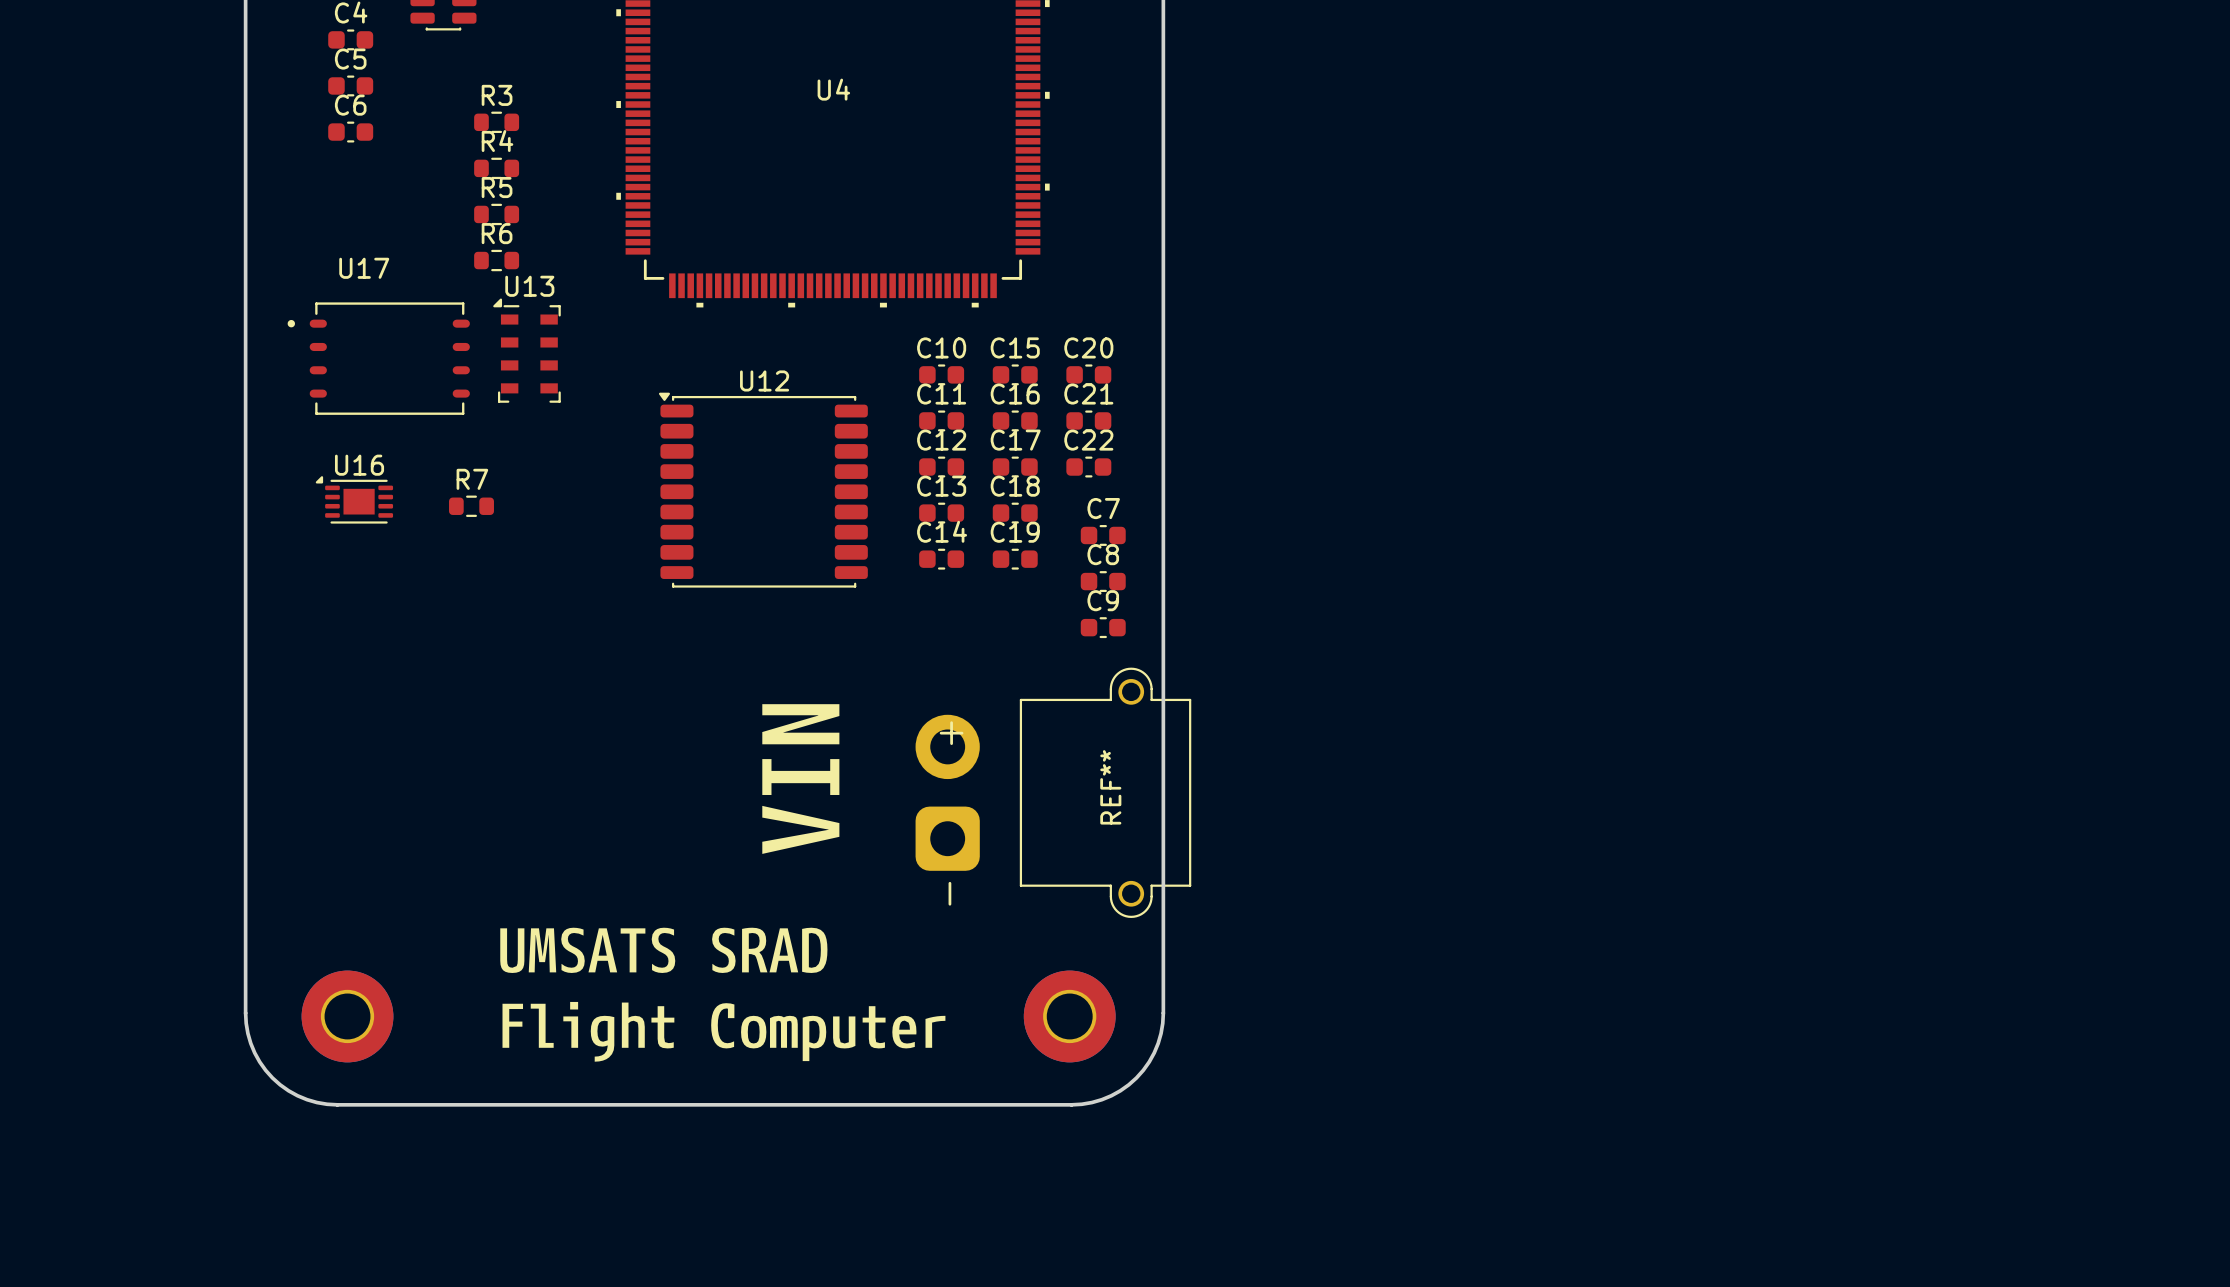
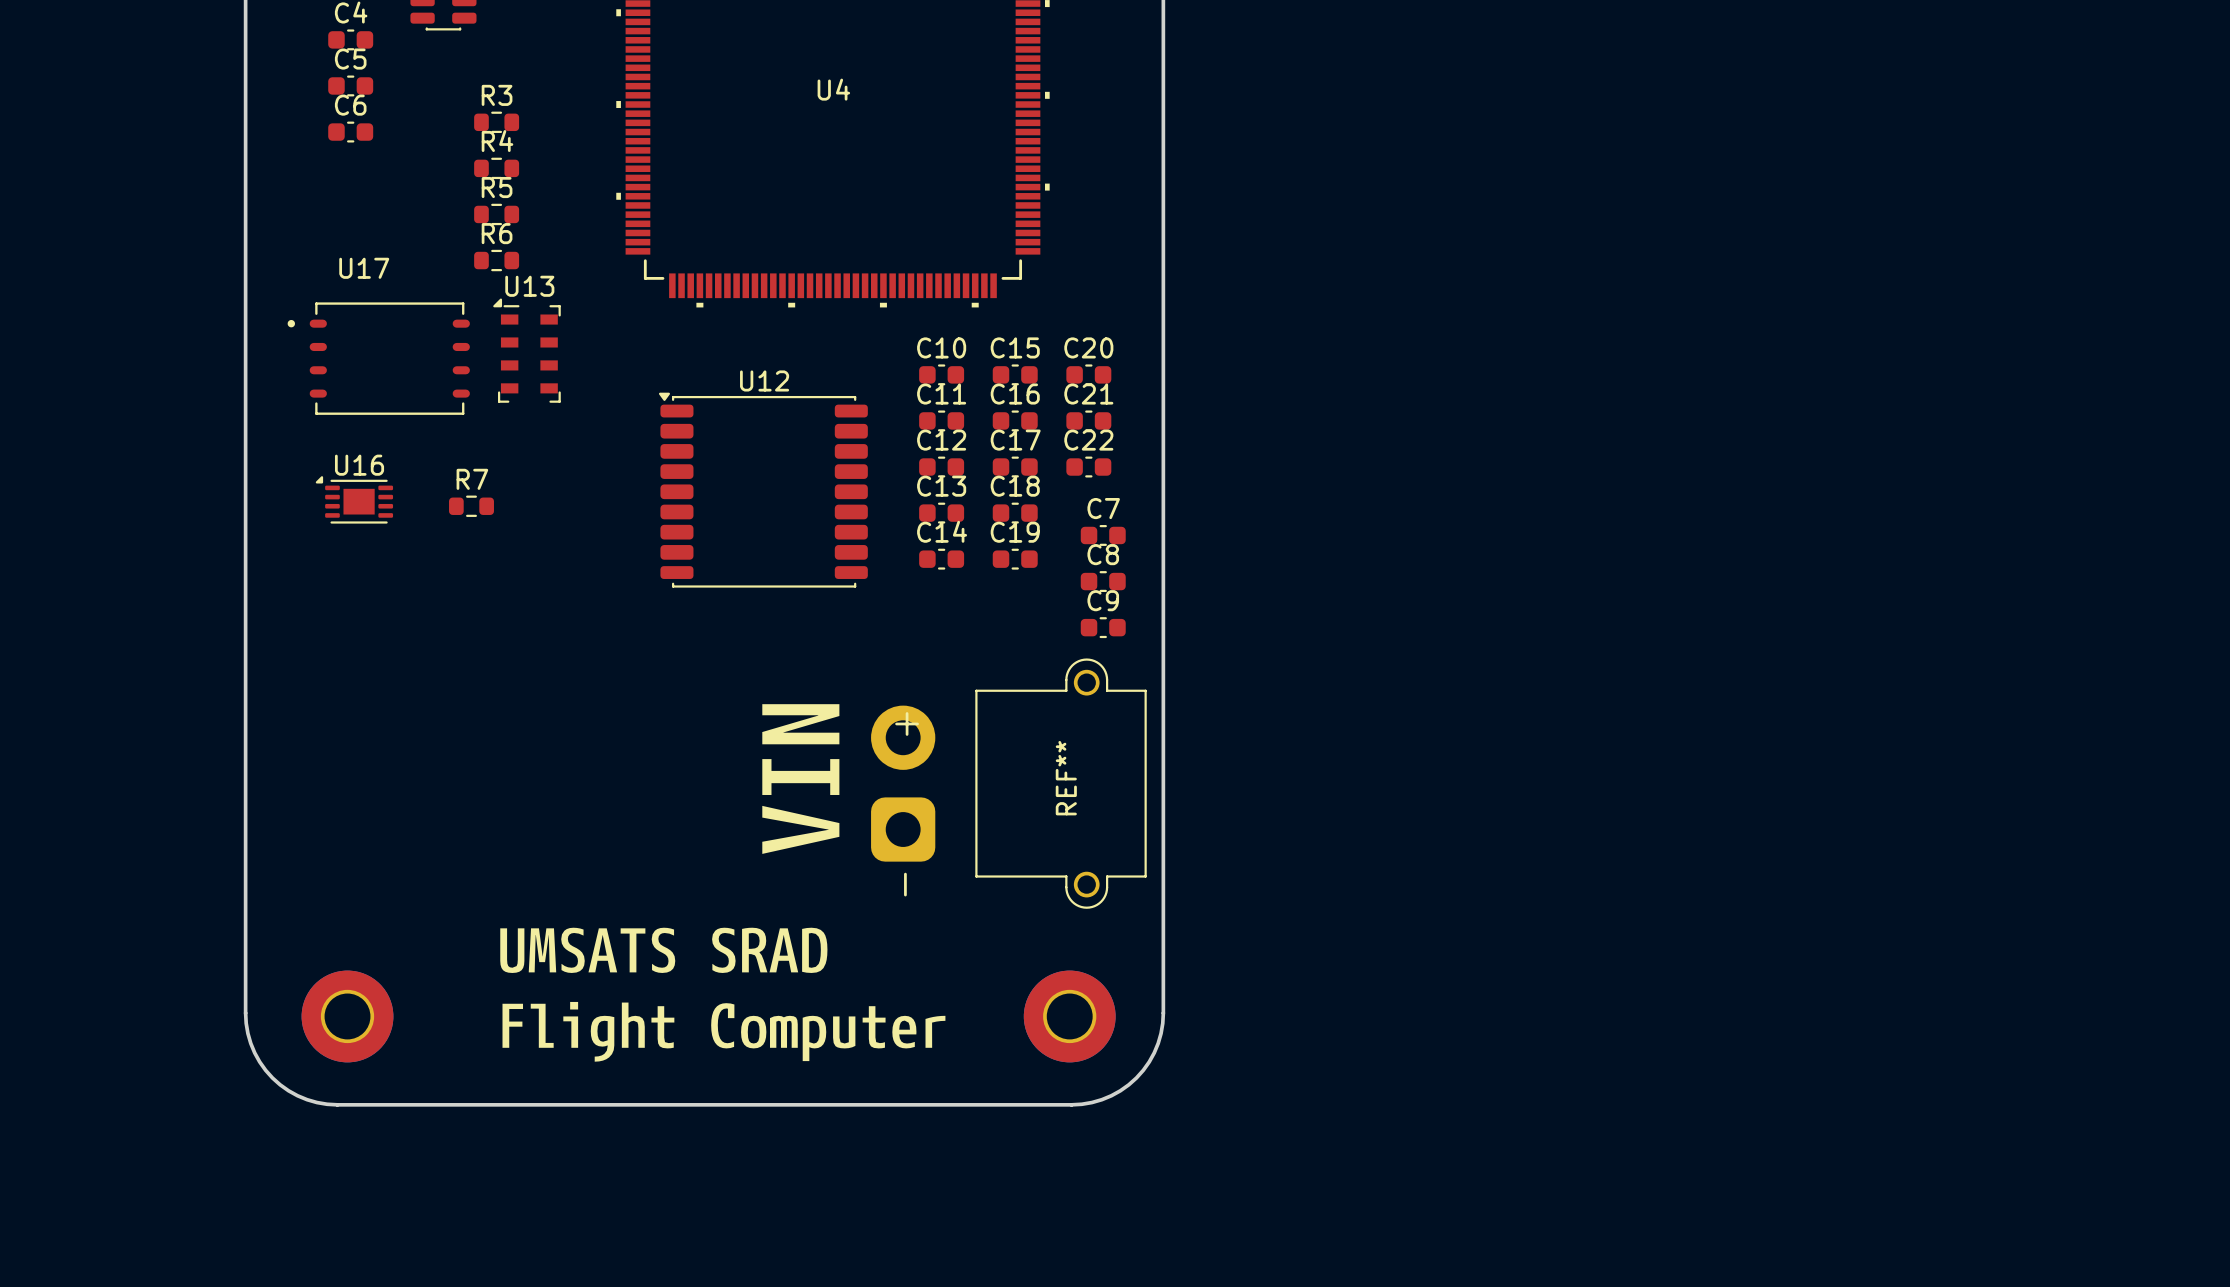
REF**: none -> (1008, 783)
REF**: (1053, 792) -> none

